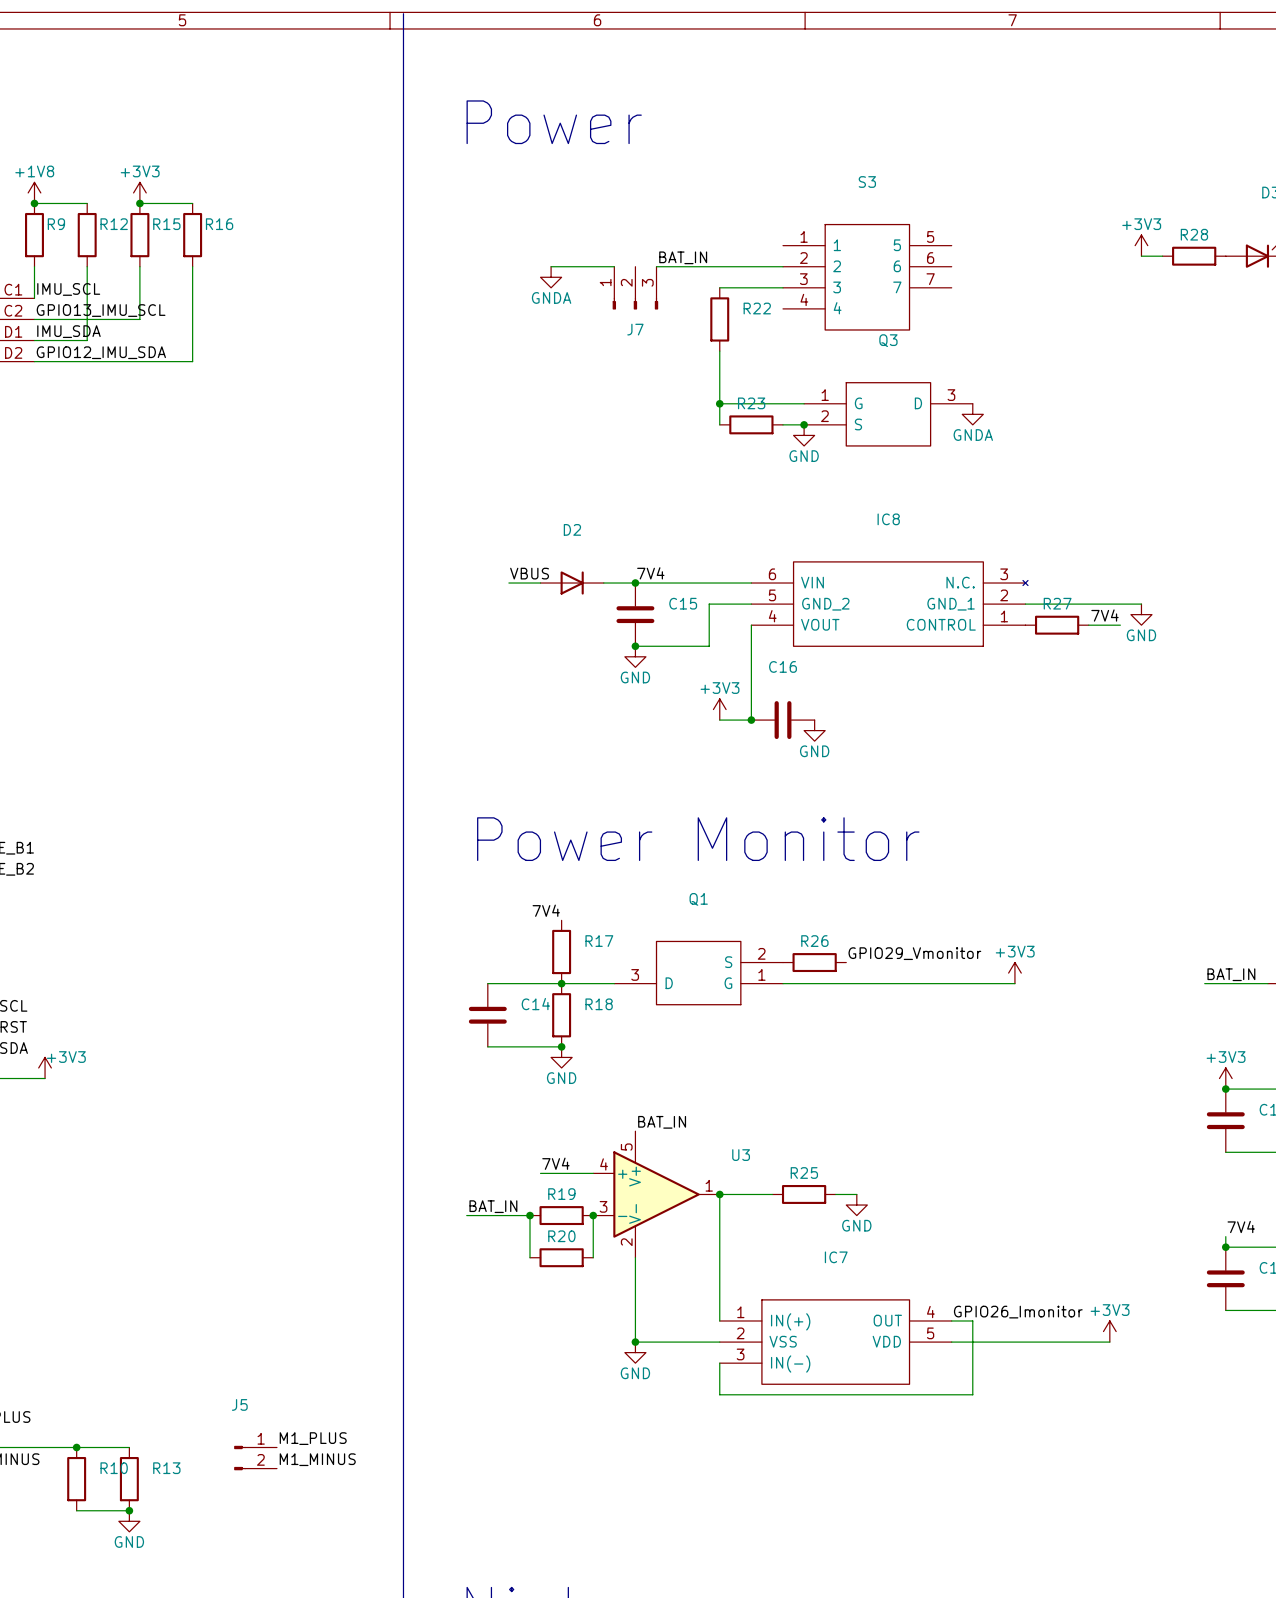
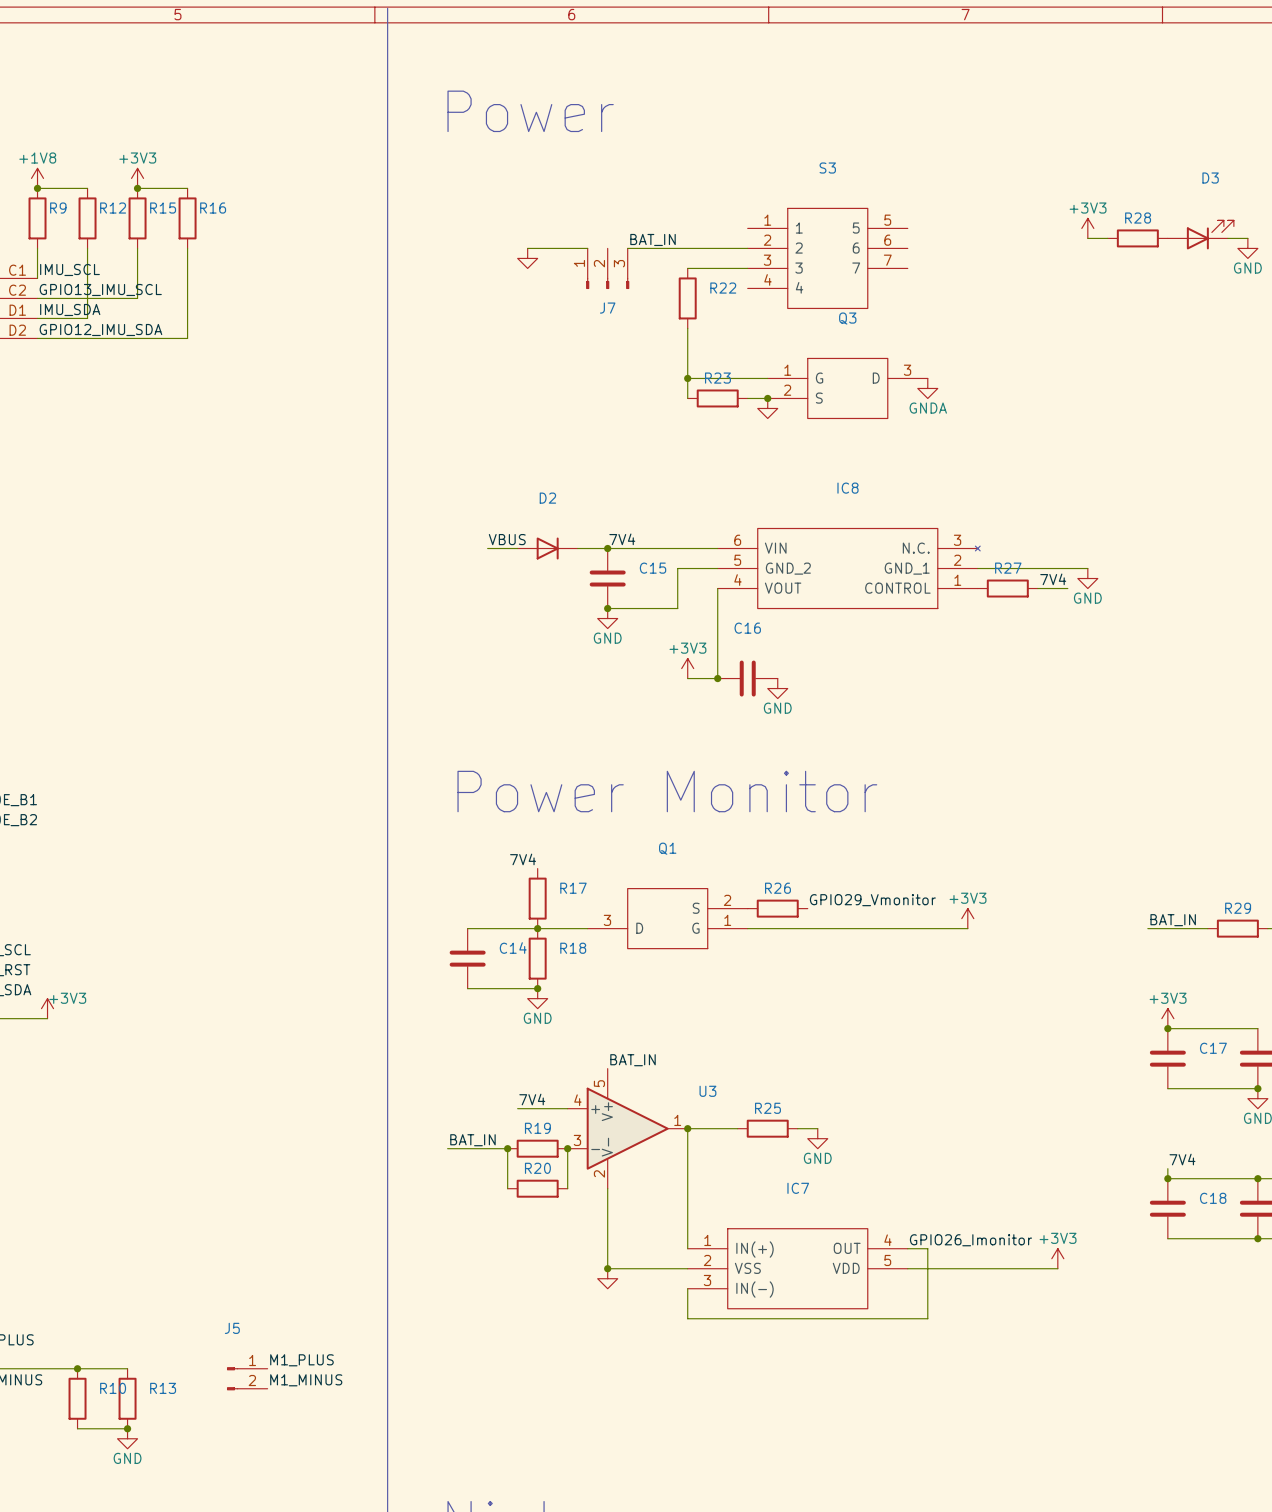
power symbol text: GNDA (551, 297) -> none
power symbol text: GND (804, 456) -> none
power symbol text: GND (635, 1373) -> none

